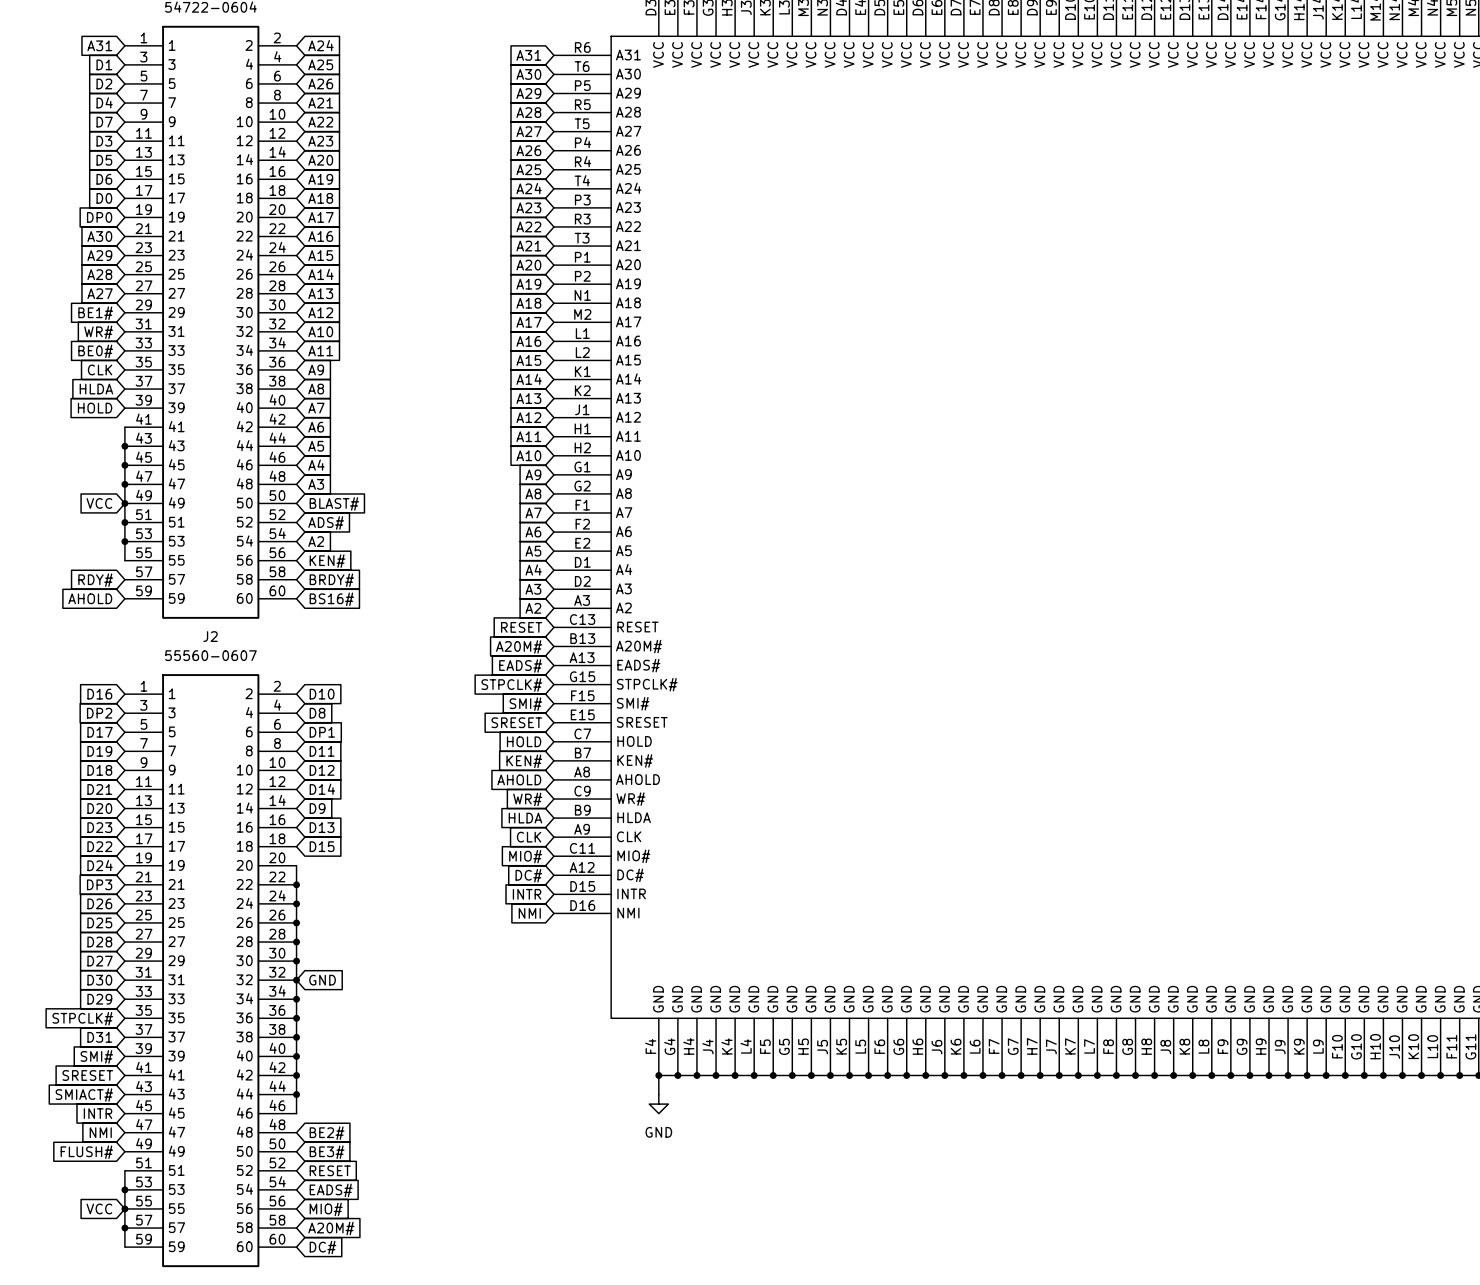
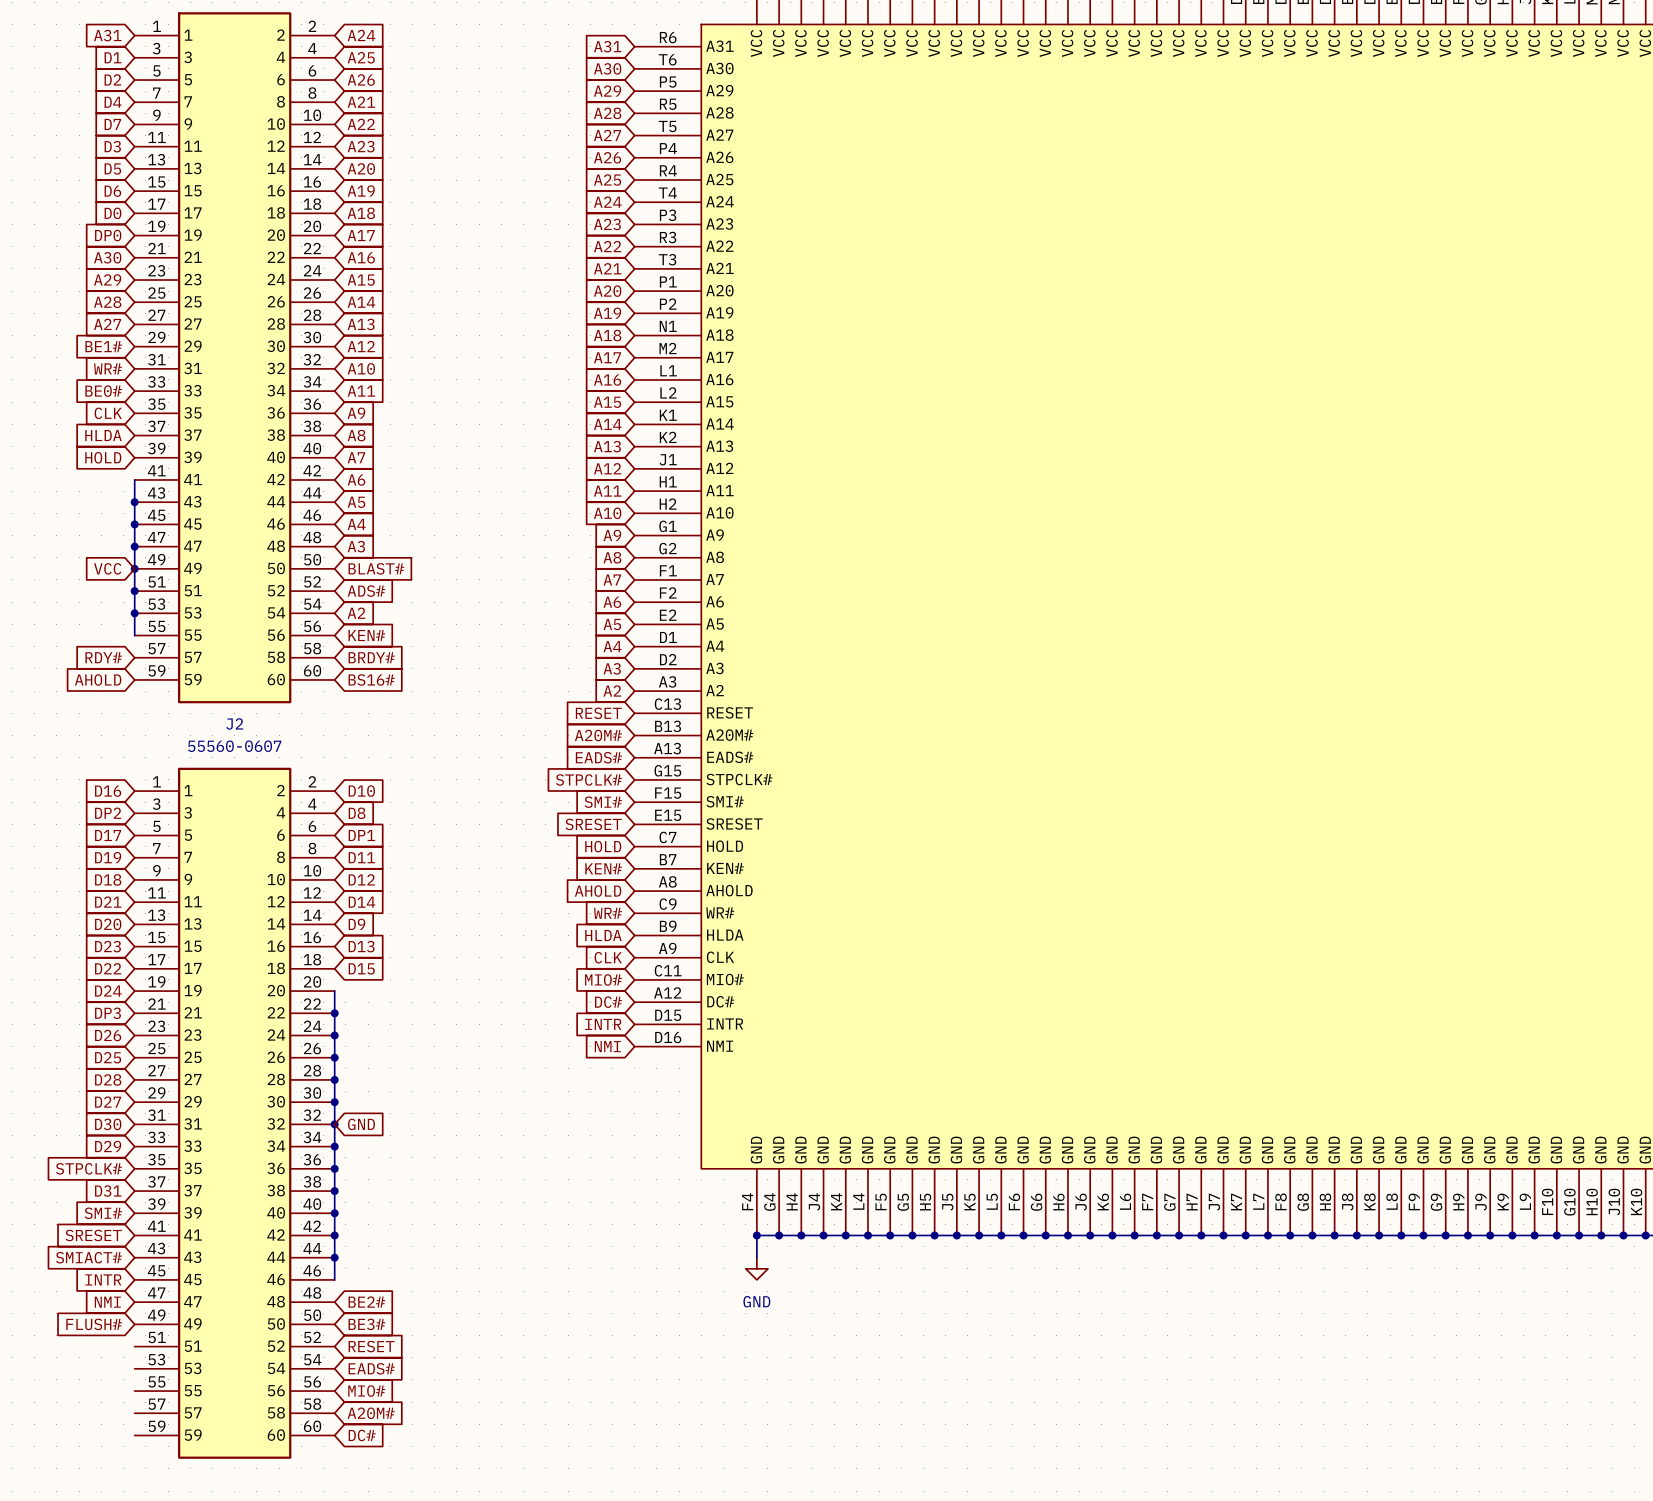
wire: (124, 1170) (124, 1247) -> none
junction: (124, 1189) -> none
global label: VCC (99, 1208) -> none
junction: (124, 1208) -> none
junction: (124, 1228) -> none

